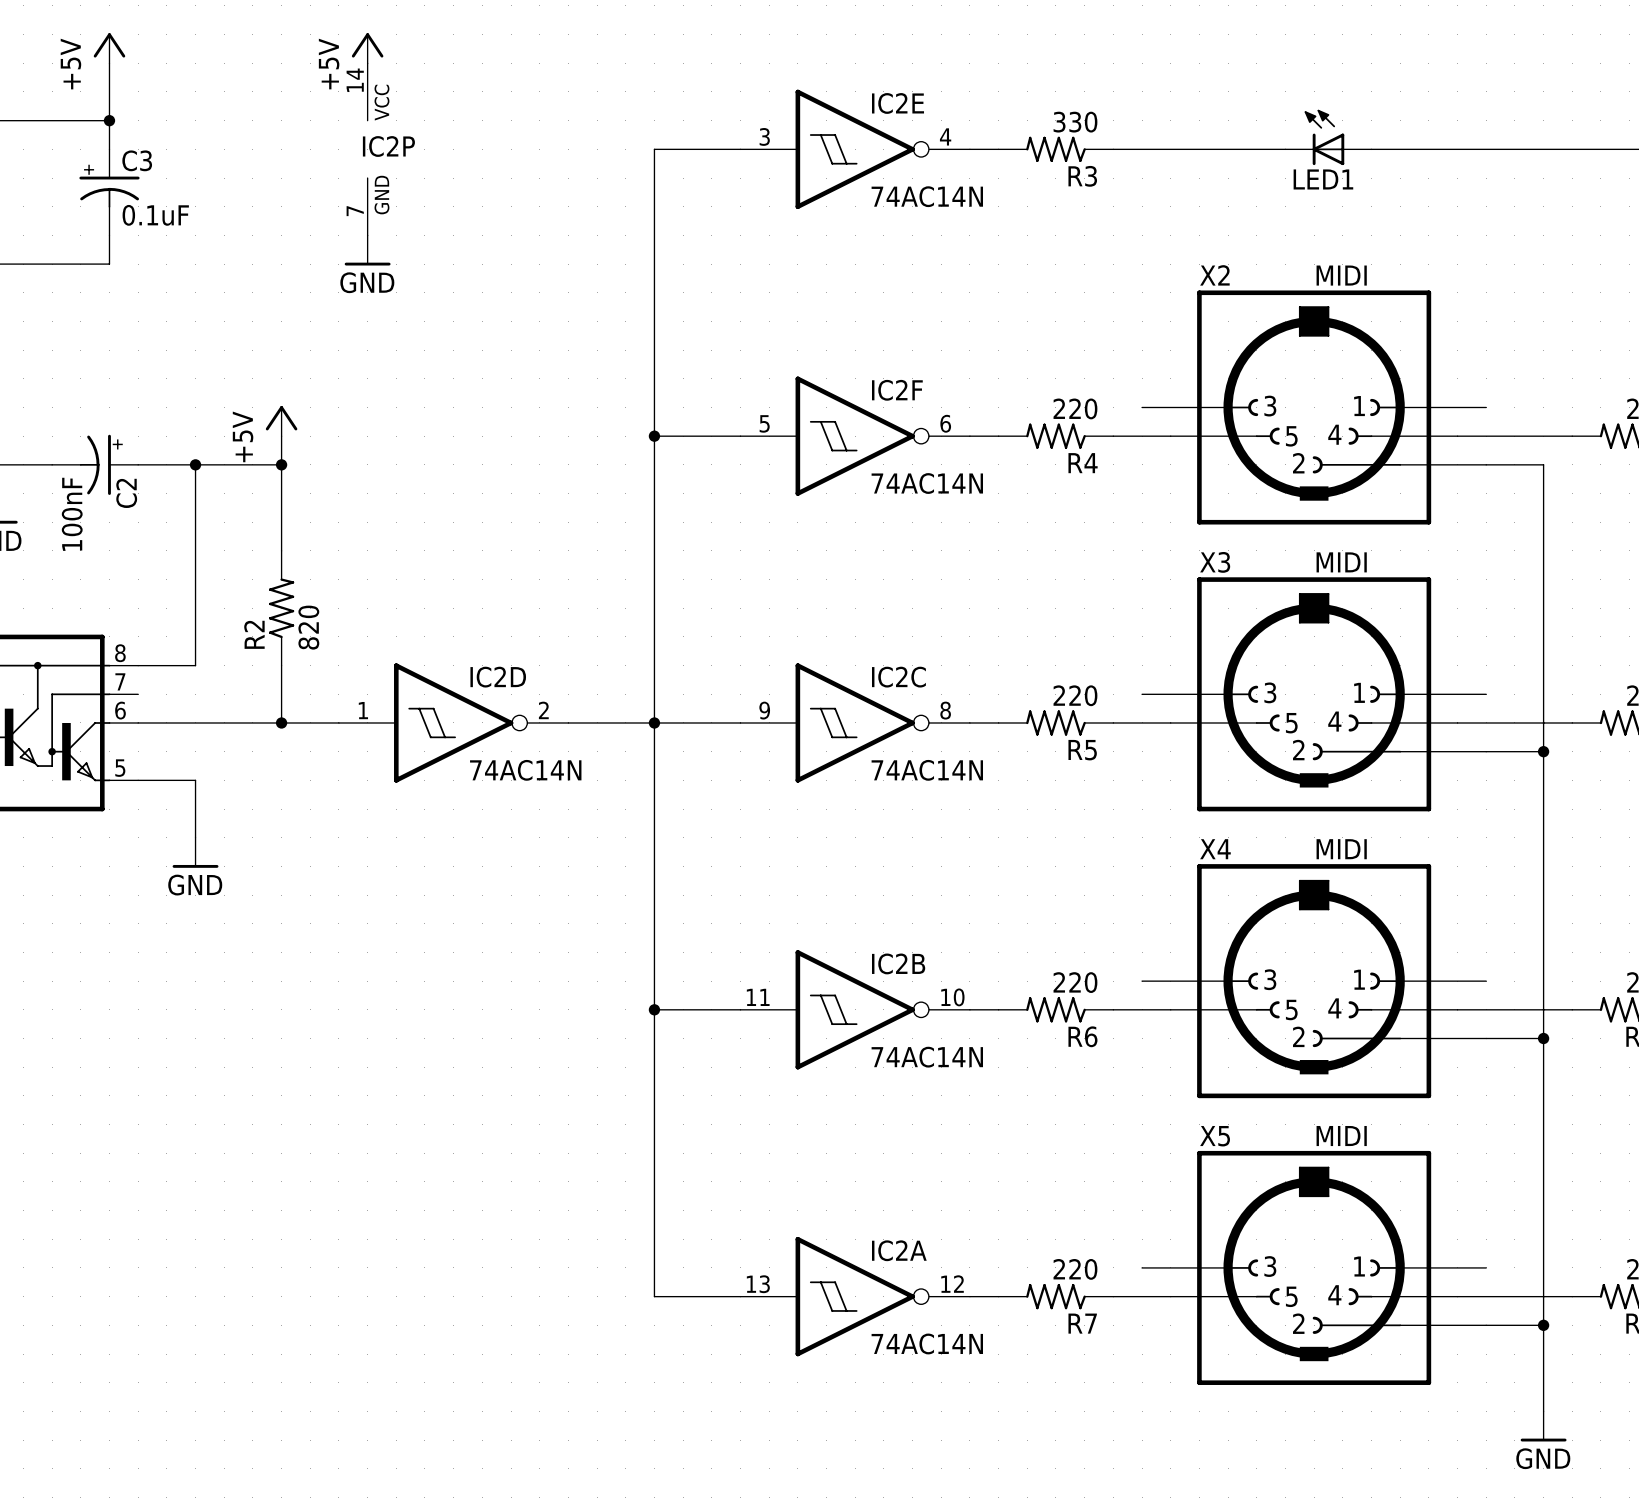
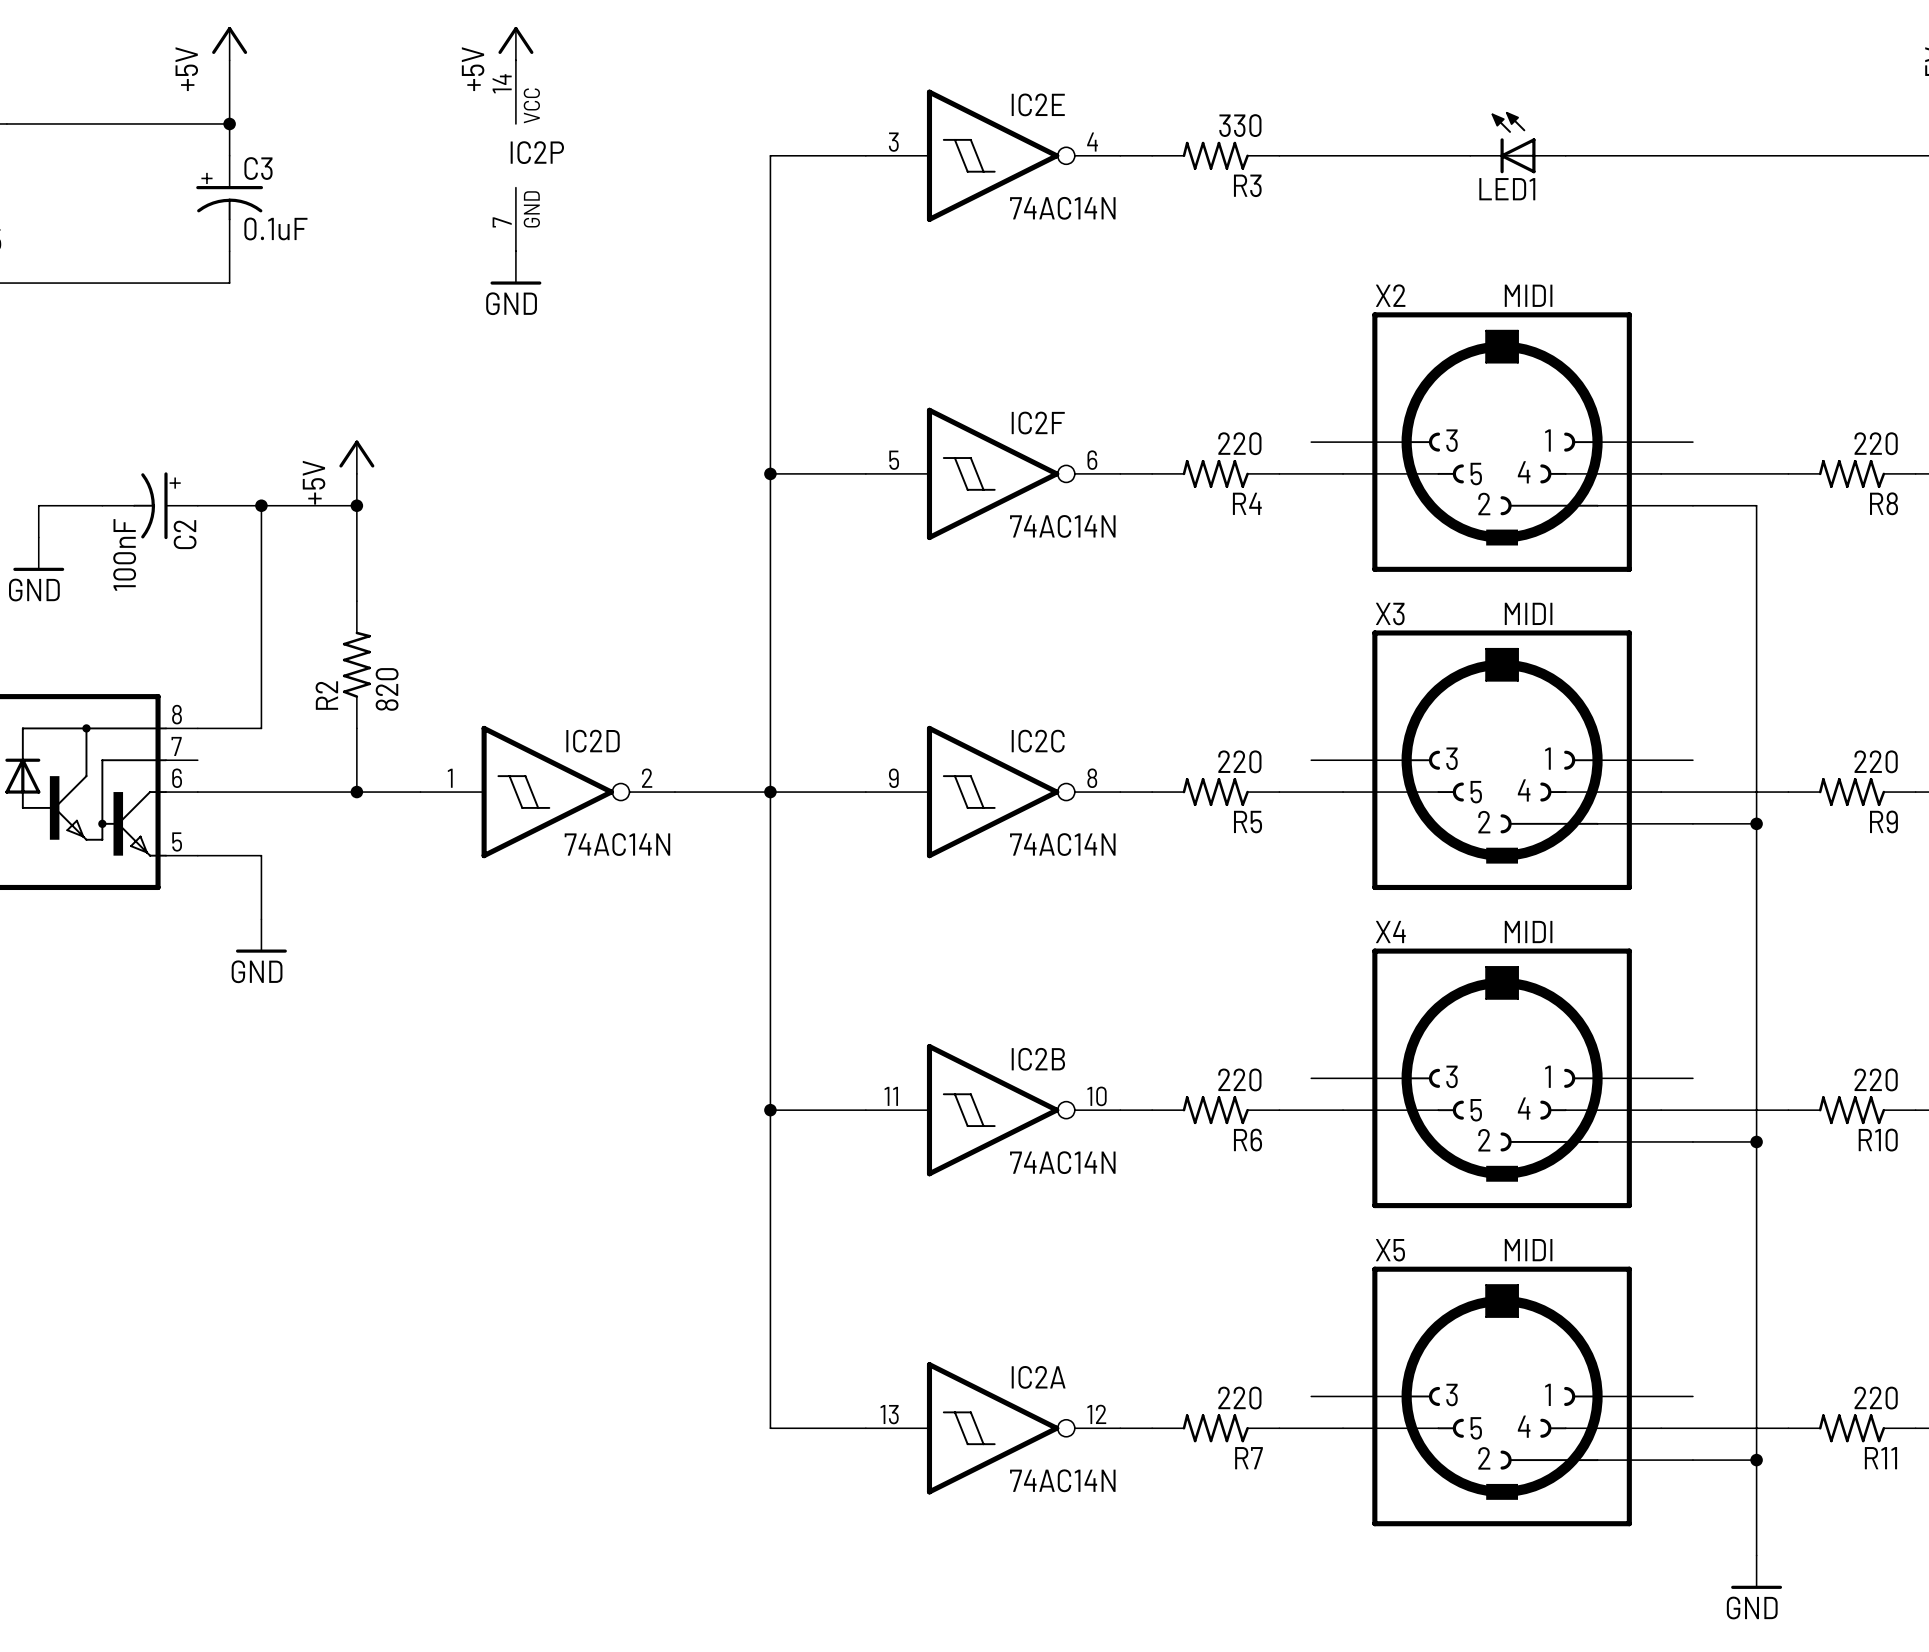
power symbol position: +5V (109, 48) -> +5V (229, 43)
power symbol position: +5V (367, 48) -> +5V (515, 43)
wire: (109, 63) (109, 149) -> (229, 60) (229, 155)
wire: none -> (165, 123) (229, 123)
junction position: (109, 120) -> (229, 123)
IC2P position: (367, 149) -> (515, 155)
C3 position: (109, 192) -> (229, 203)
wire: (109, 235) (109, 264) -> (229, 251) (229, 283) (165, 283)
power symbol position: GND (367, 250) -> GND (515, 267)

